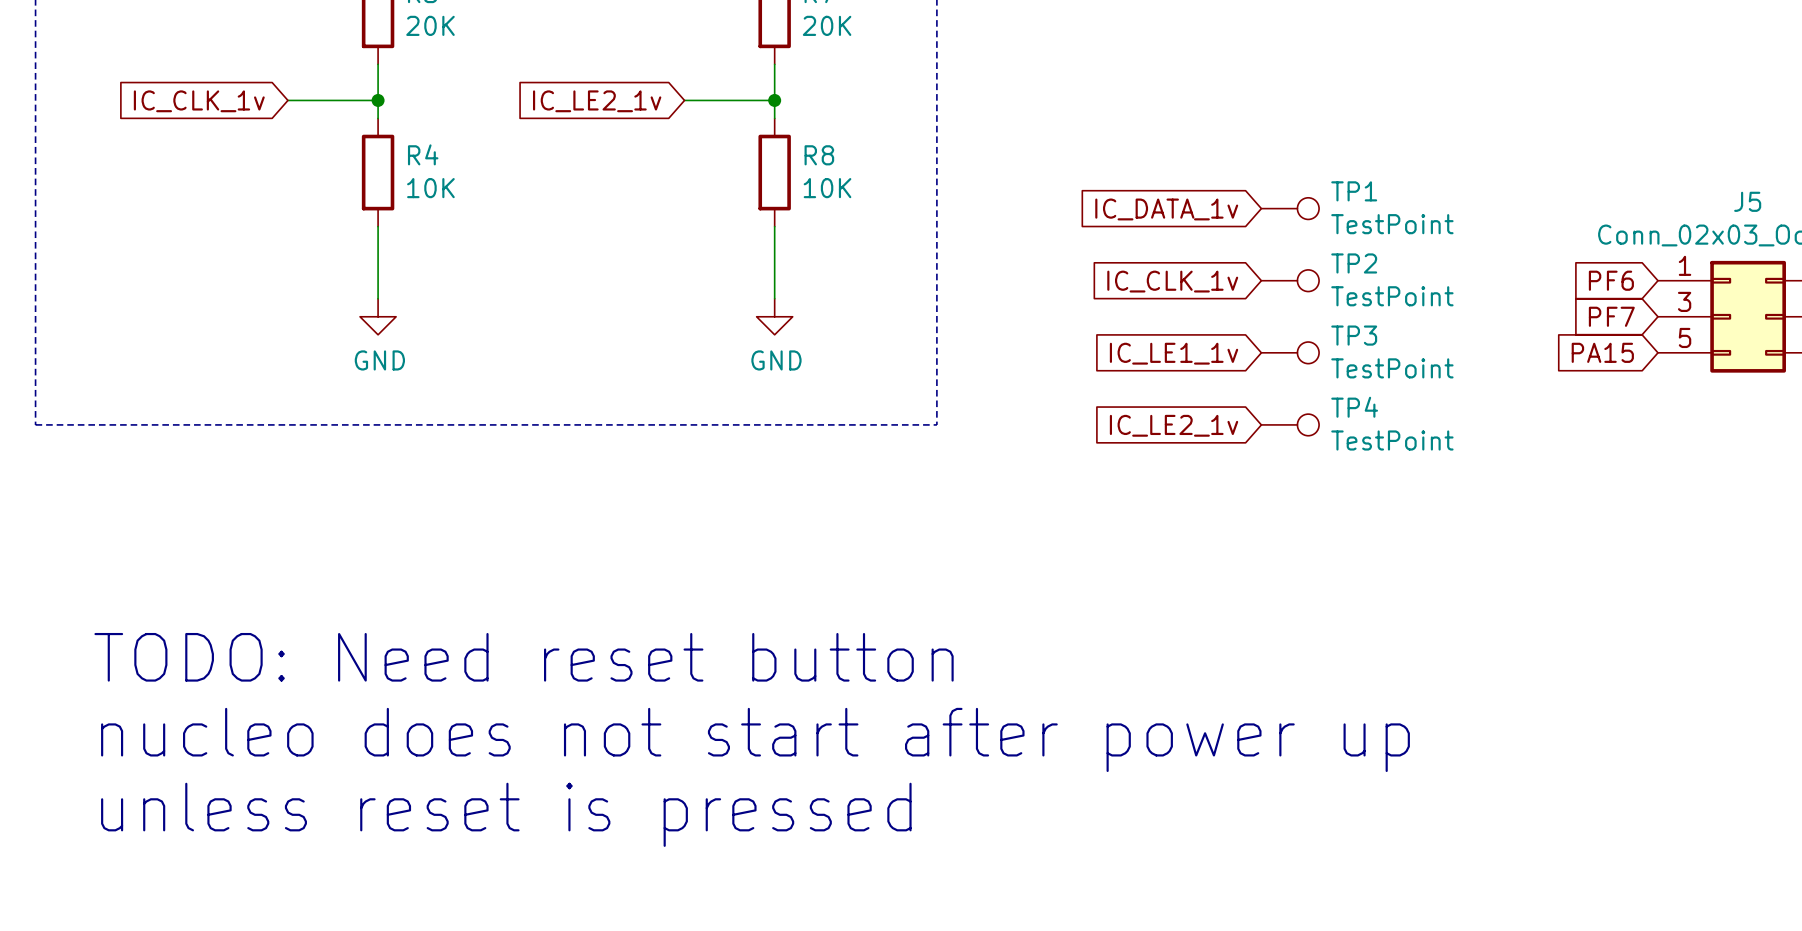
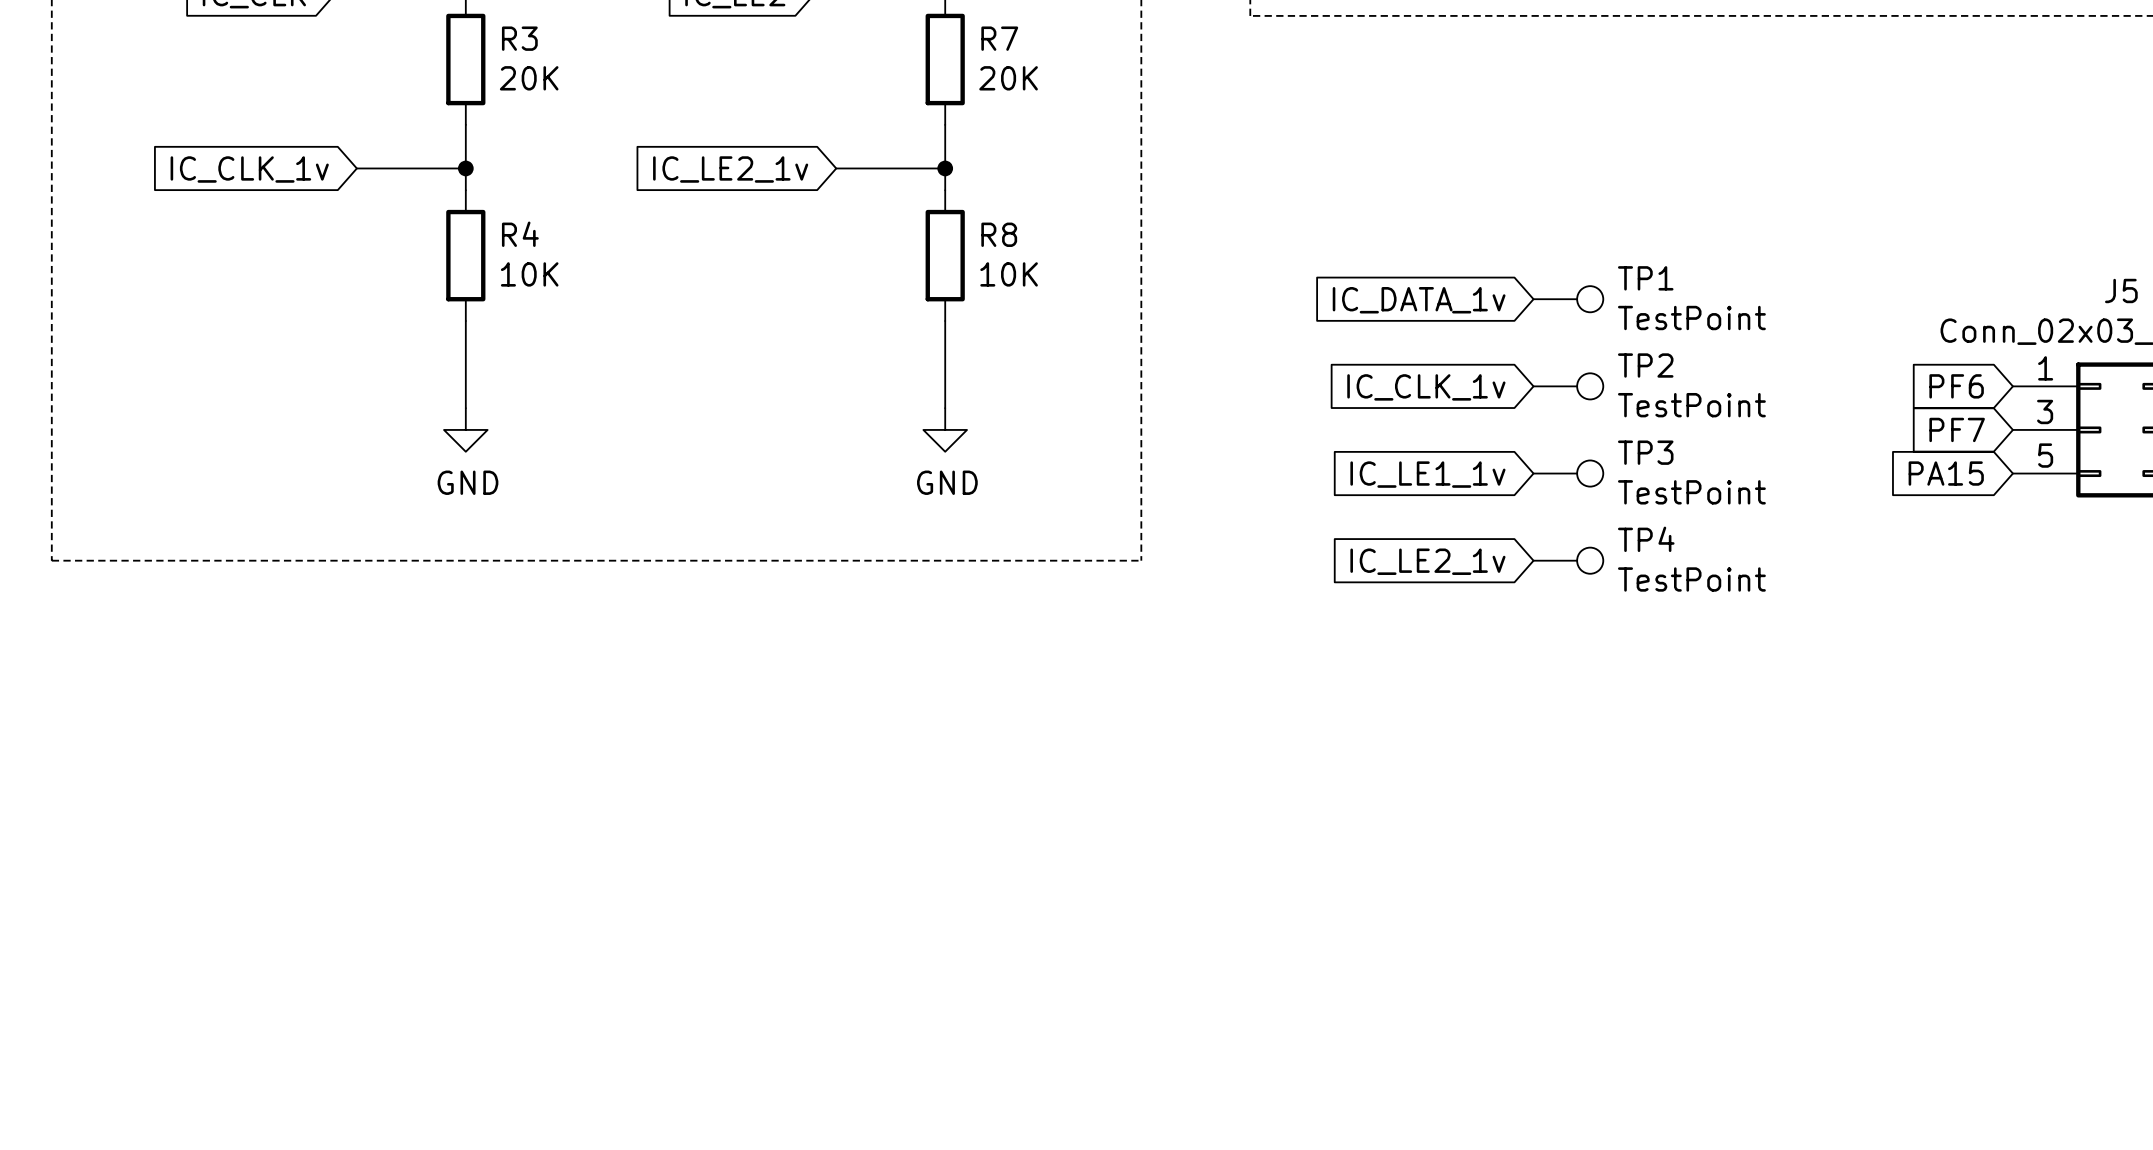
text: TODO: Need reset button (524, 657) -> none
text: nucleo does not start after power up (755, 739) -> none
text: unless reset is pressed (506, 814) -> none

